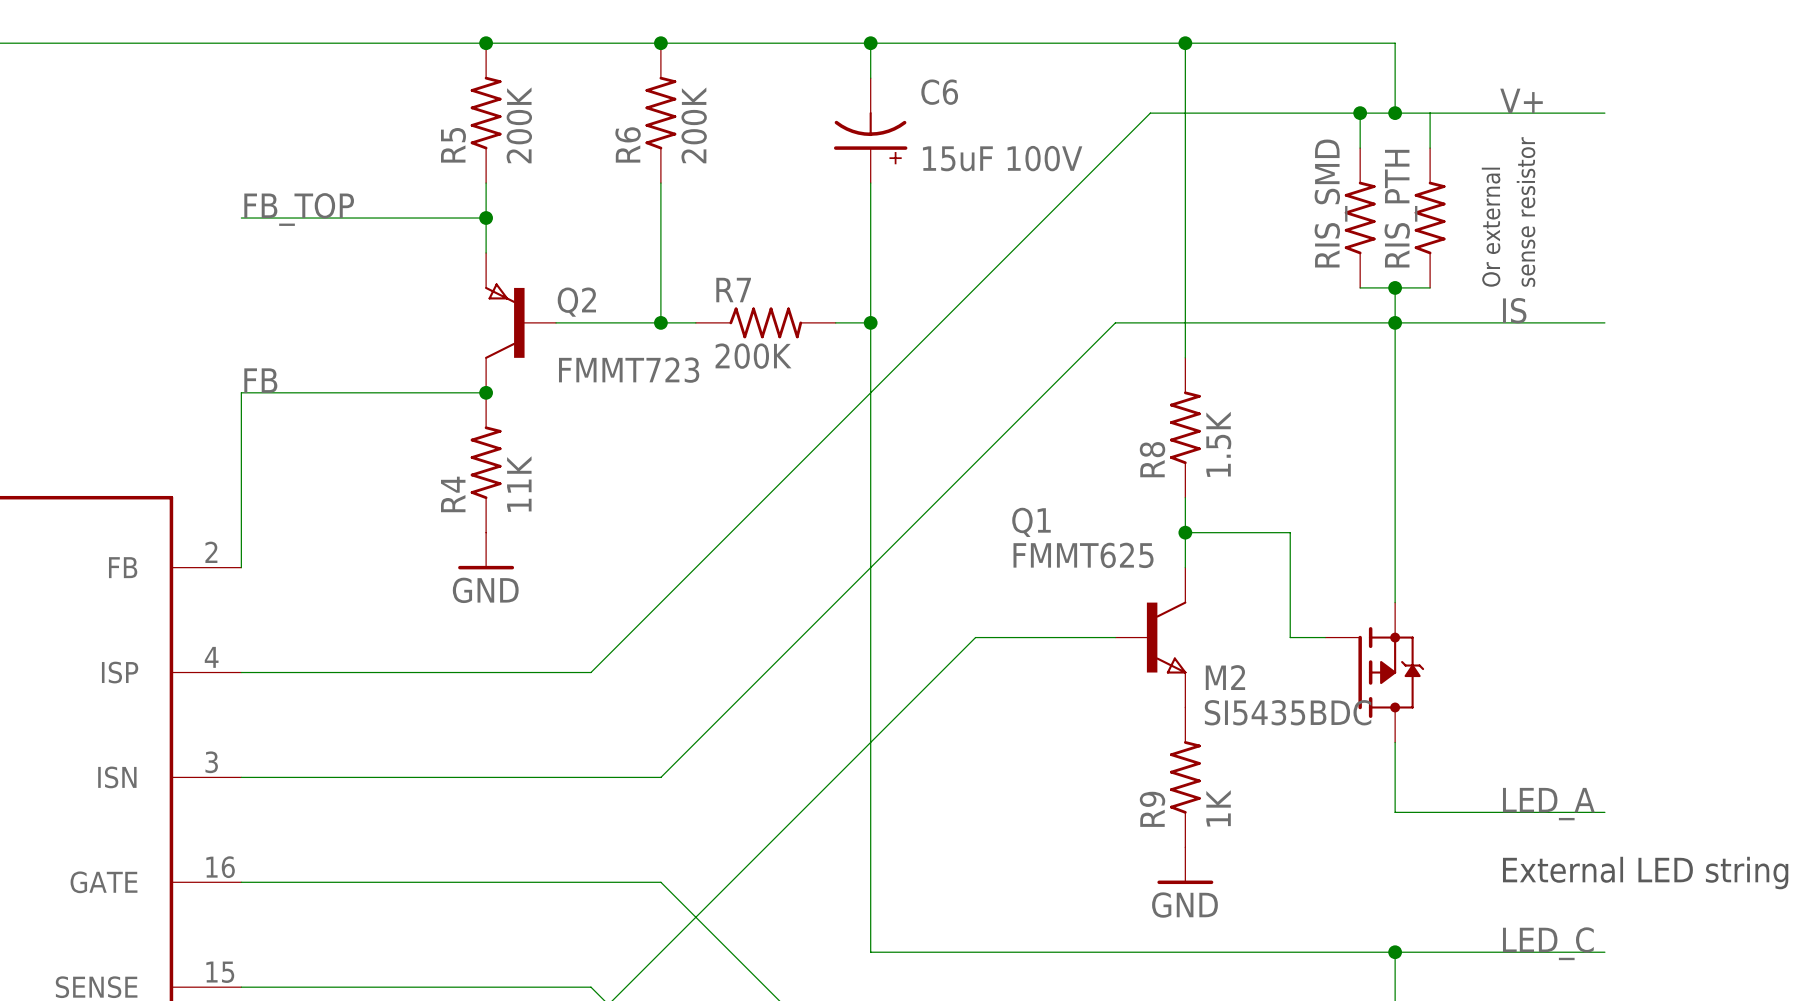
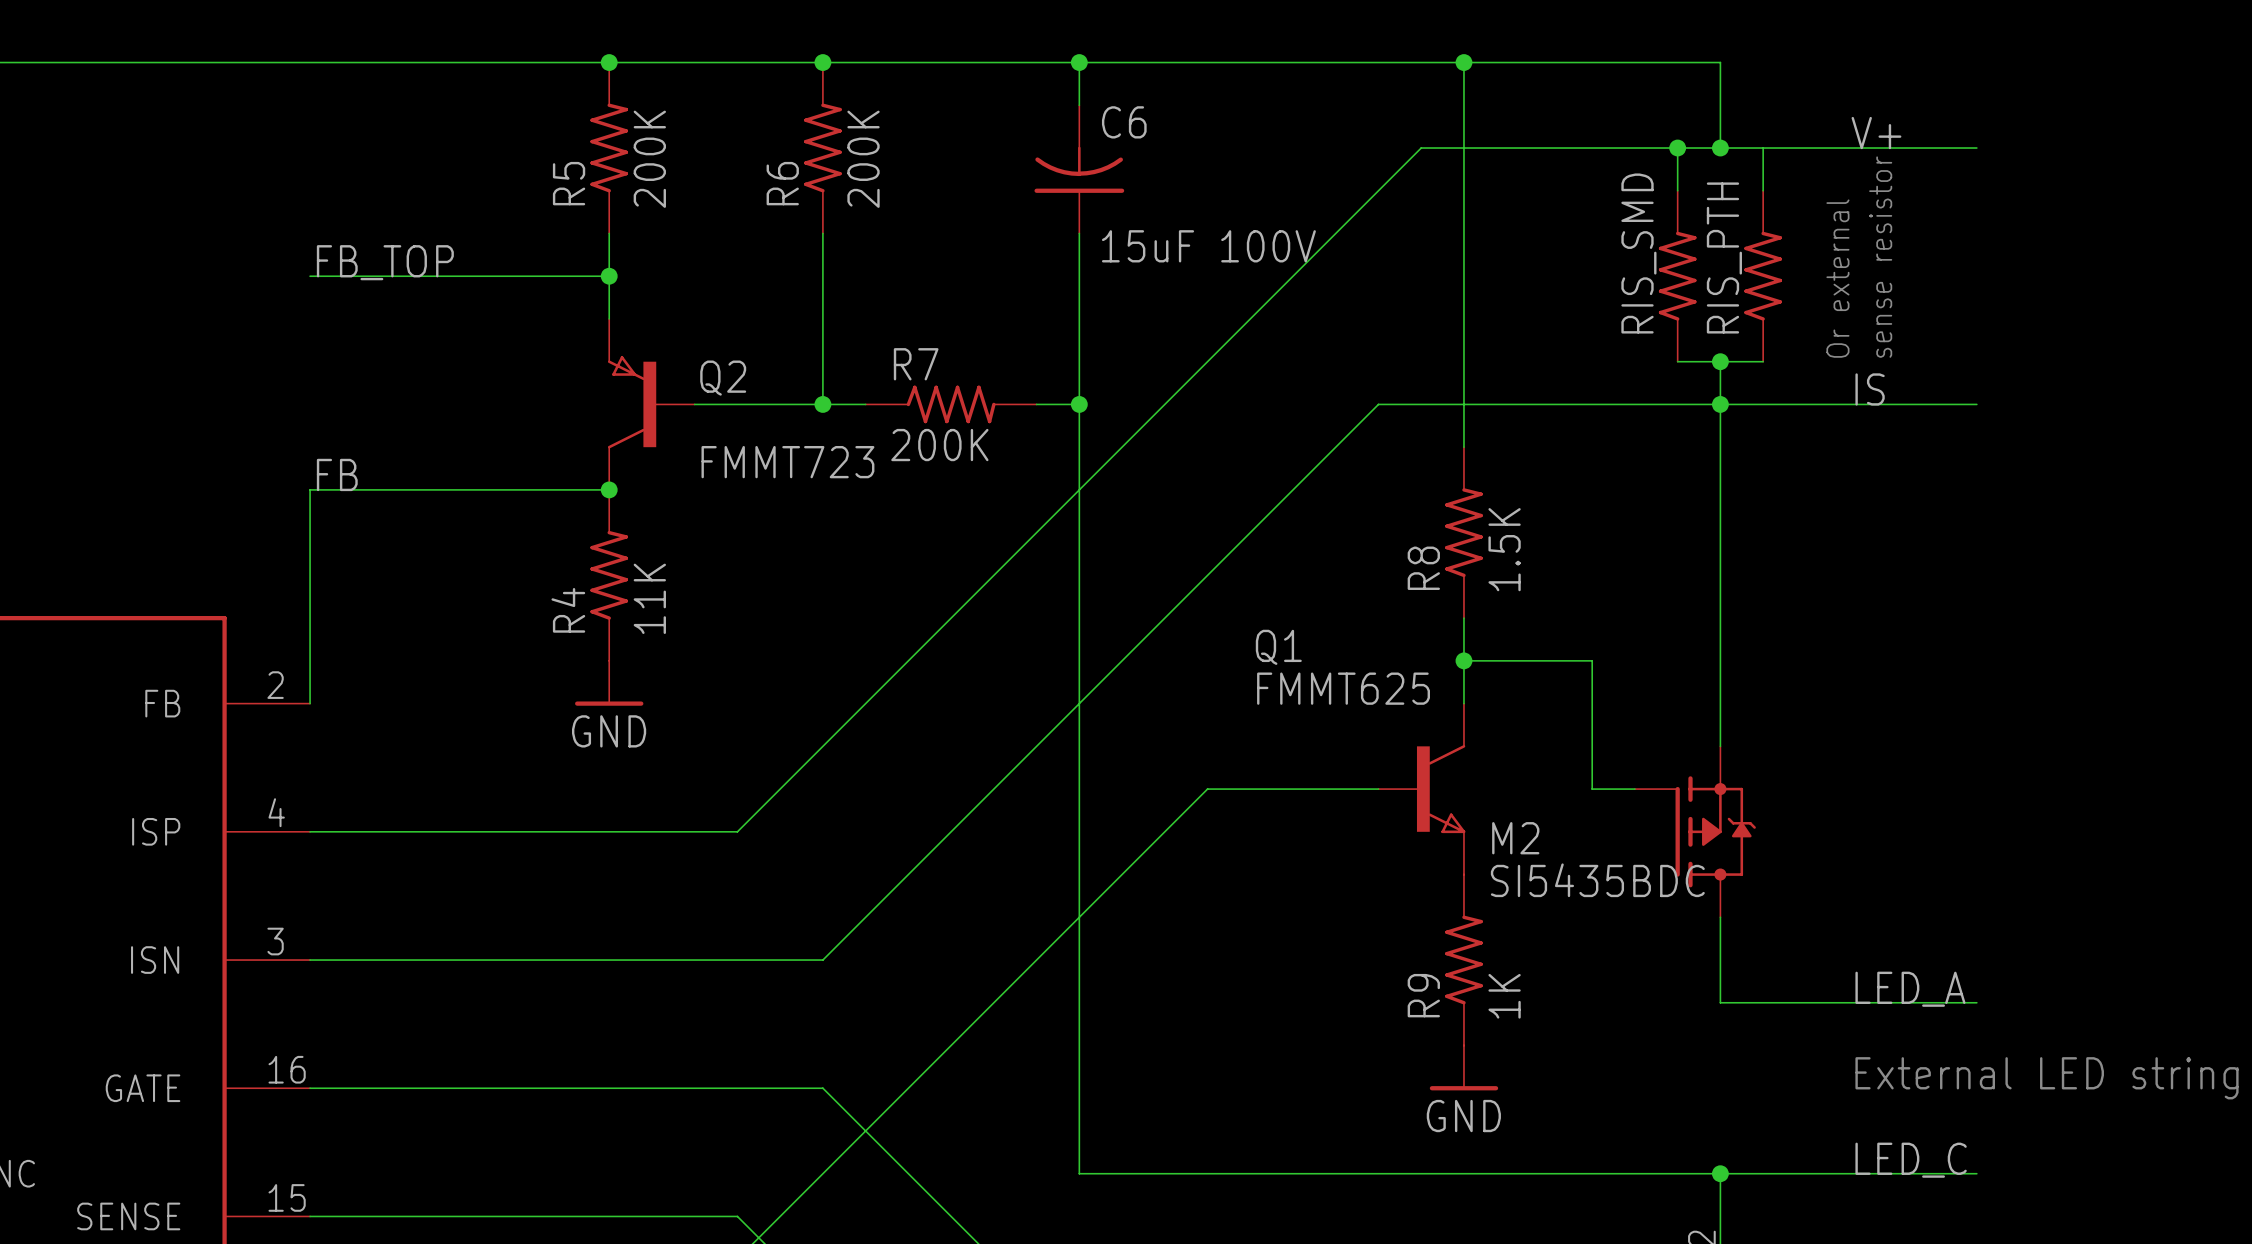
C6 symbol: [833, 78, 908, 184] -> [1034, 105, 1125, 234]
C6 name position: C6 (939, 92) -> C6 (1124, 122)
C6 value position: 15uF 100V (1002, 158) -> 15uF 100V (1208, 246)

